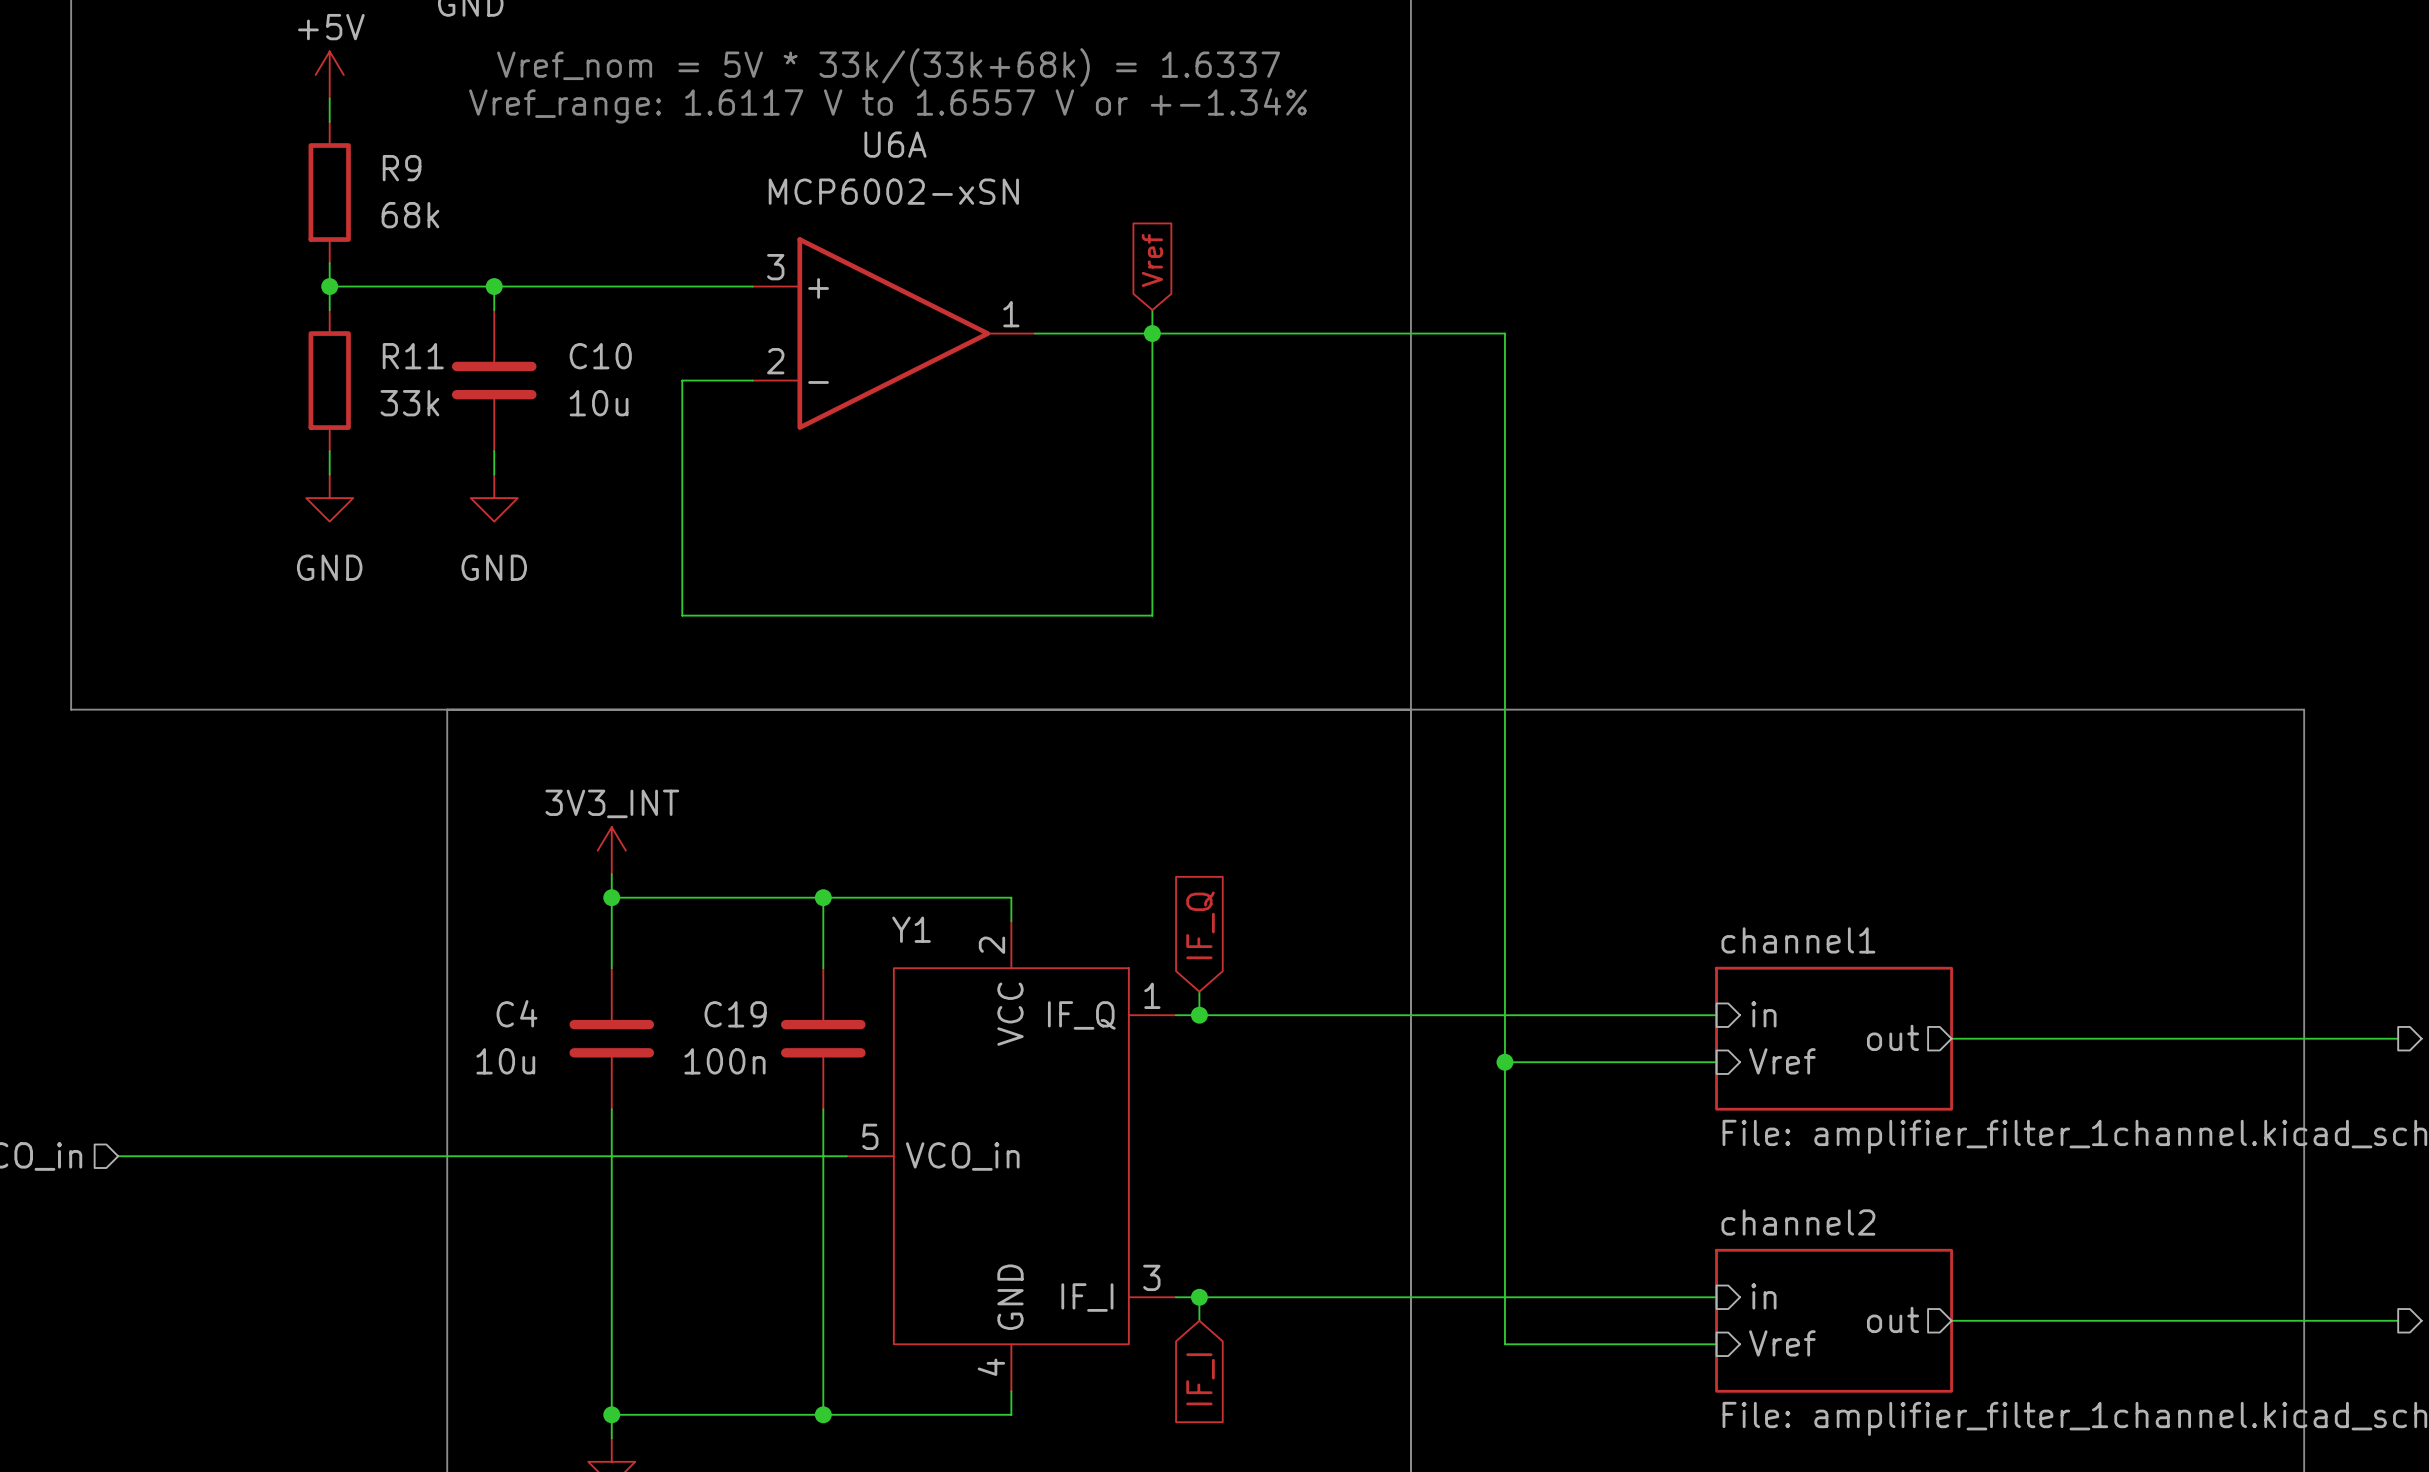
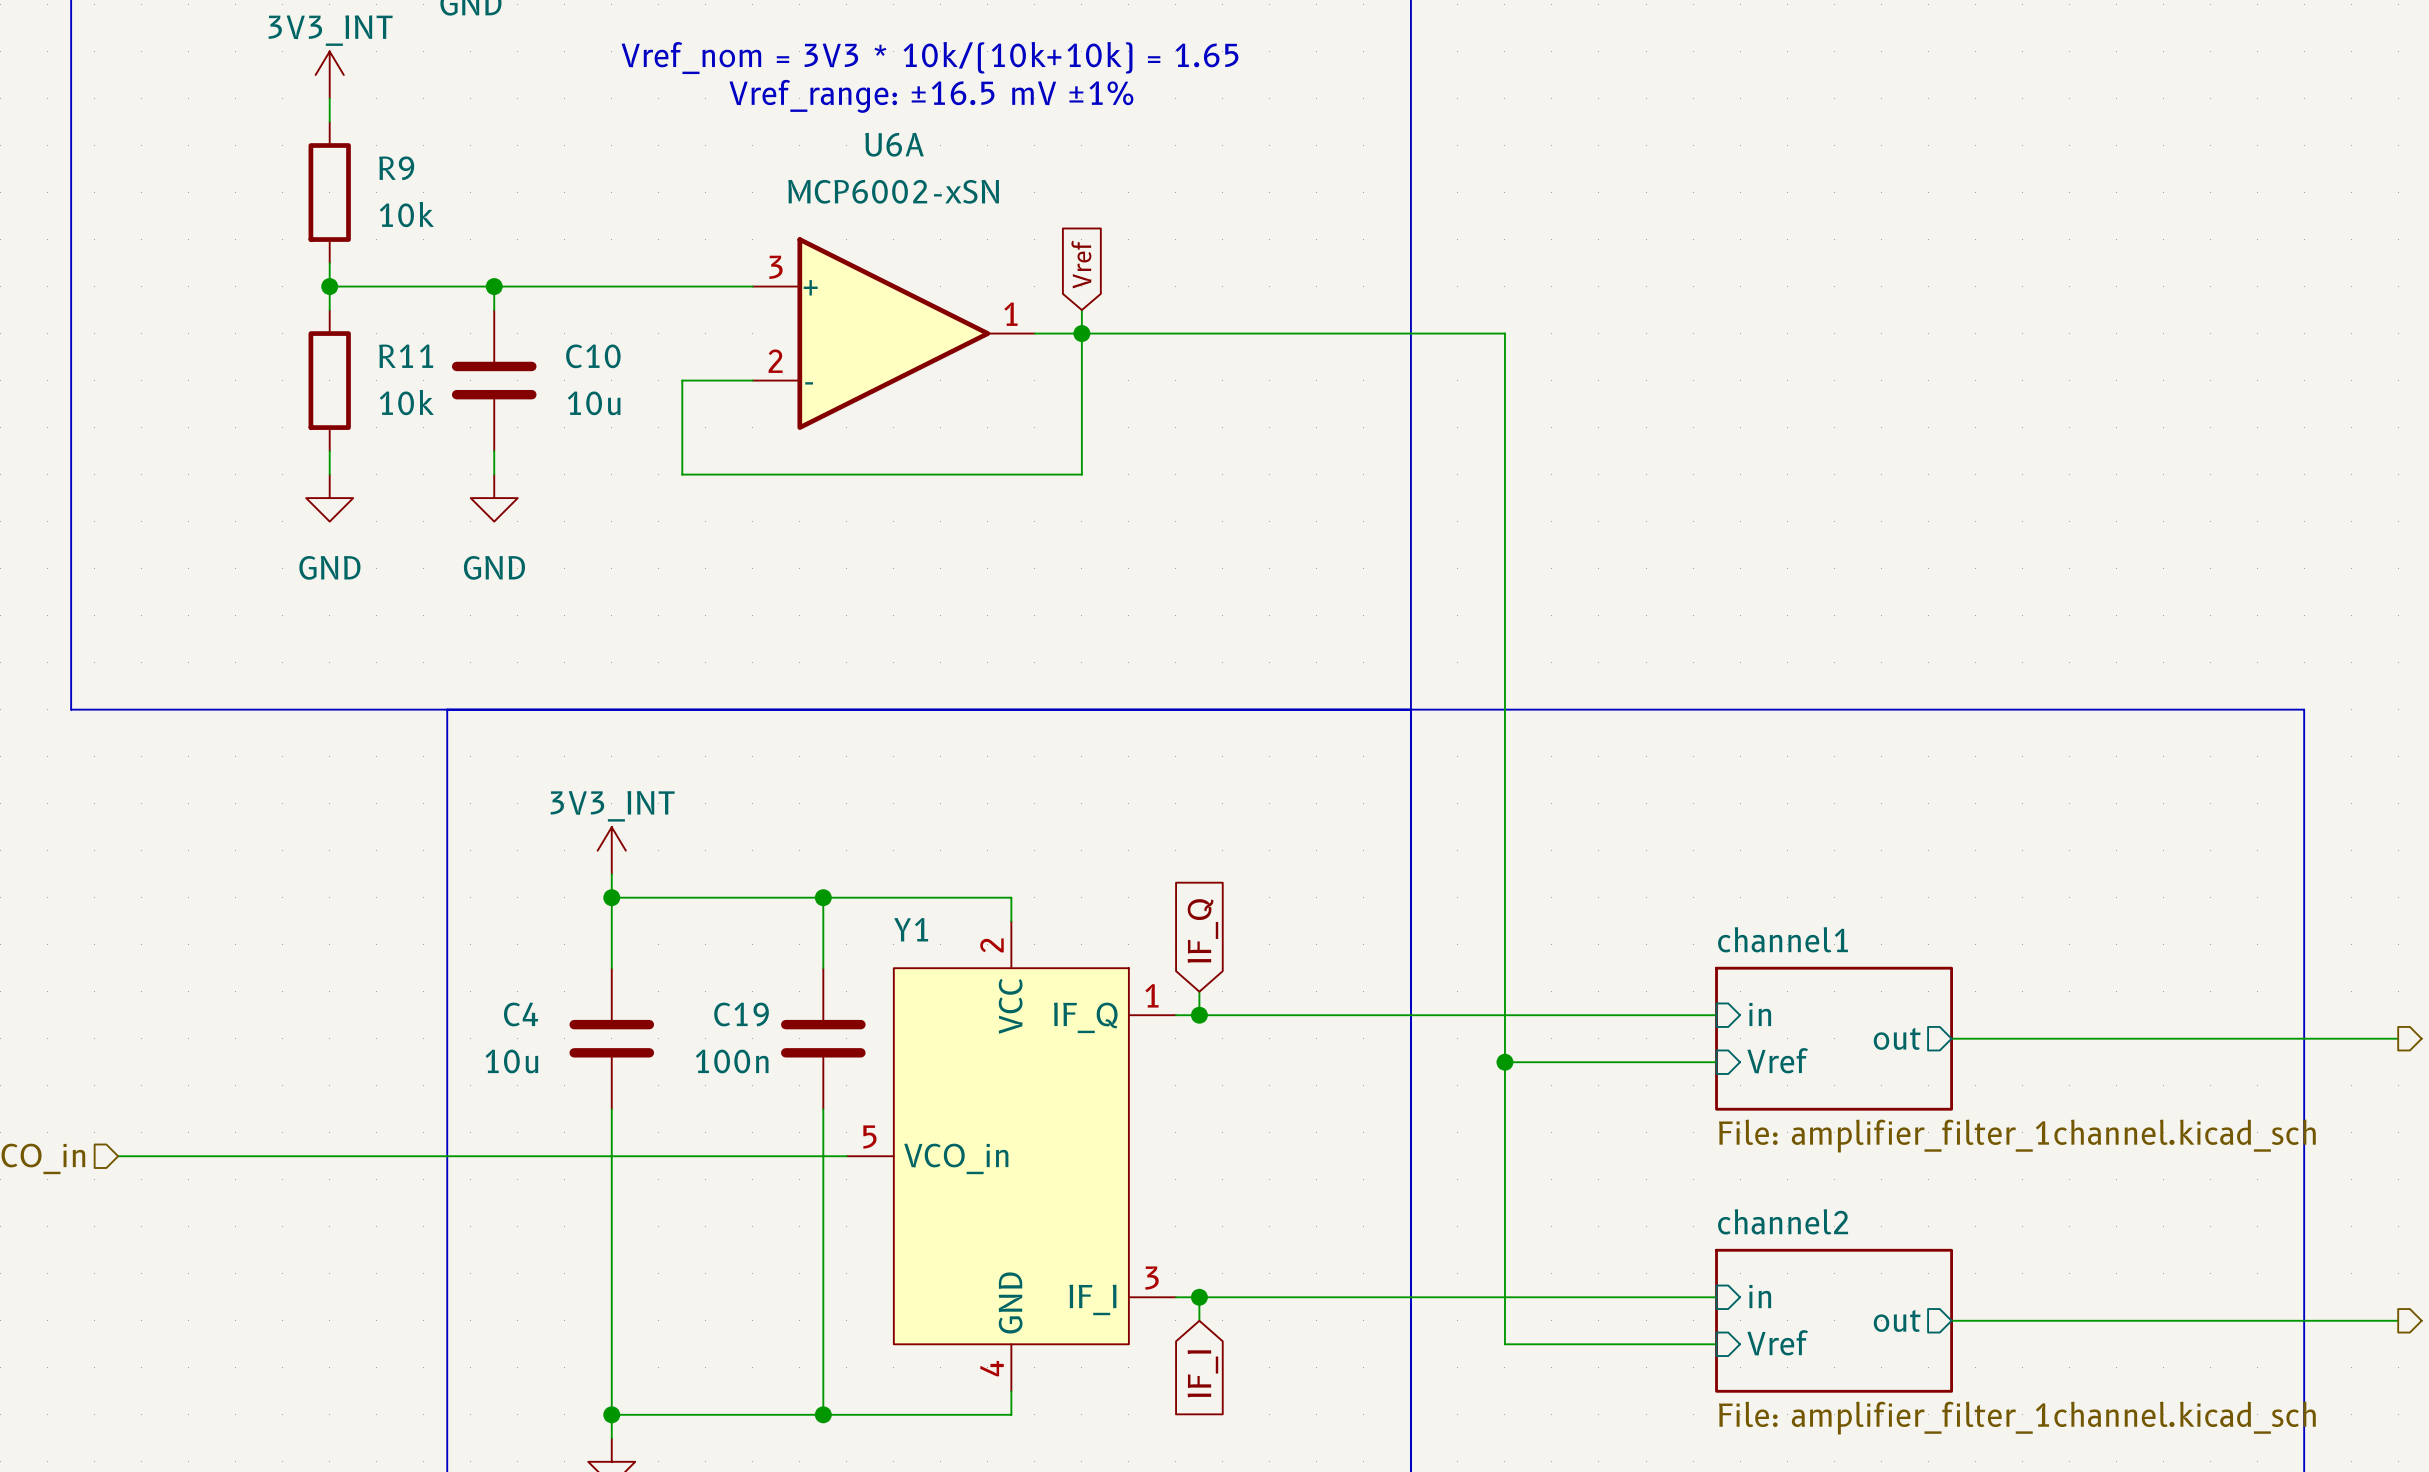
text: Vref_nom = 5V * 33k/(33k+68k) = 1.6337 (888, 67) -> Vref_nom = 3V3 * 10k/(10k+10k) = 1.65 (930, 58)
power symbol: +5V (329, 74) -> 3V3_INT (329, 74)
text: none -> Vref_range: ±16.5 mV ±1% (931, 96)
text: Vref_range: 1.6117 V to 1.6557 V or +-1.34% (888, 105) -> none
R9 value: 68k (410, 215) -> 10k (406, 214)
global label position: Vref (1152, 260) -> Vref (1081, 264)
wire: (1152, 310) (1152, 615) (682, 615) (682, 474) -> (1081, 310) (1081, 474) (682, 474)
junction position: (1152, 333) -> (1081, 333)
R11 value: 33k (409, 403) -> 10k (406, 402)

